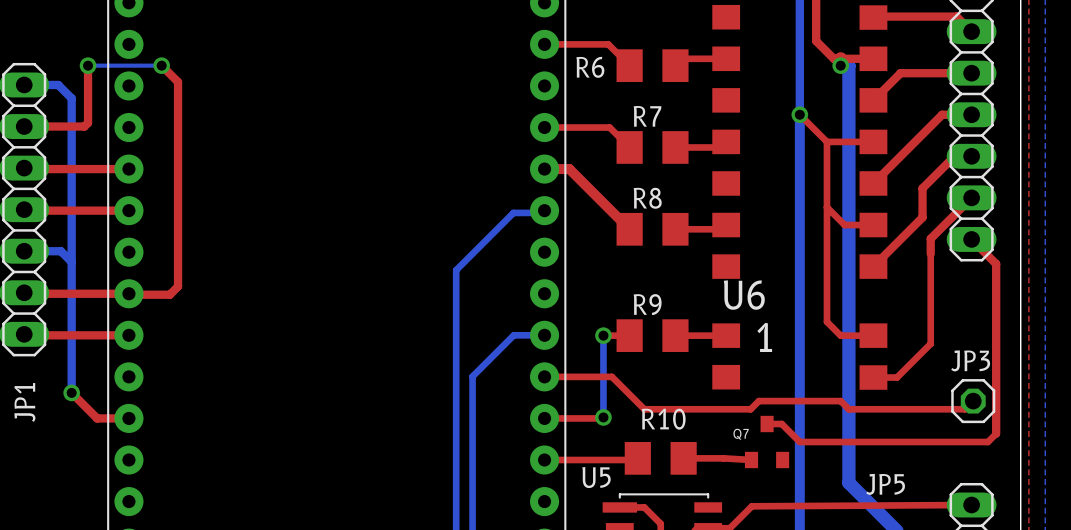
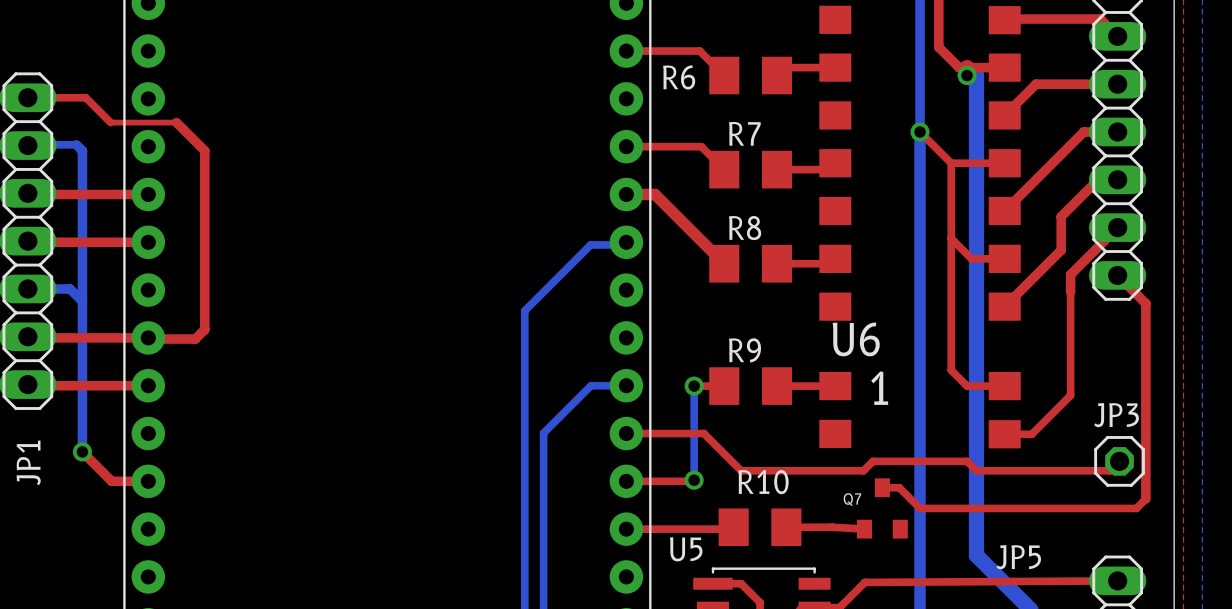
bottom track: (88, 65) (161, 65) -> none
top track: (88, 65) (88, 122) (84, 126) (24, 126) -> none
via: (88, 65) -> none
top track: (161, 65) (178, 82) (178, 131) -> (27, 97) (85, 97) (110, 122) (176, 122) (204, 150)
via: (161, 65) -> none
bottom track: (24, 84) (58, 84) (71, 98) (71, 131) -> (27, 145) (76, 144) (82, 150)

